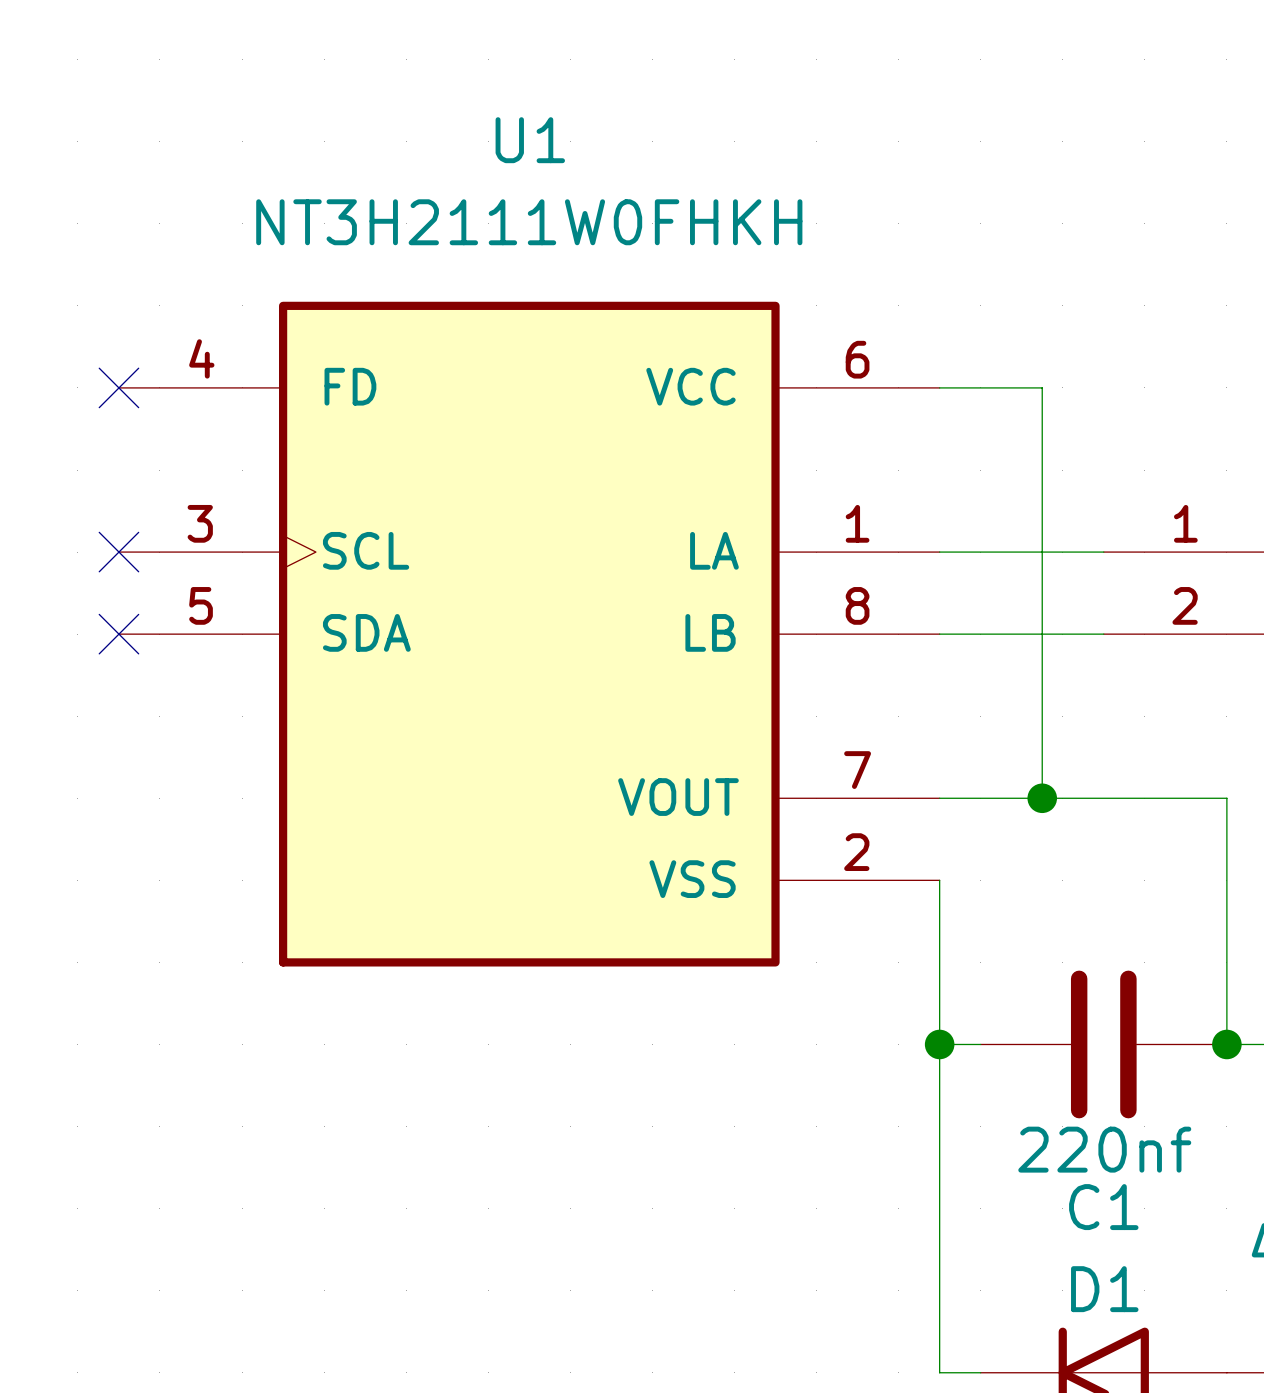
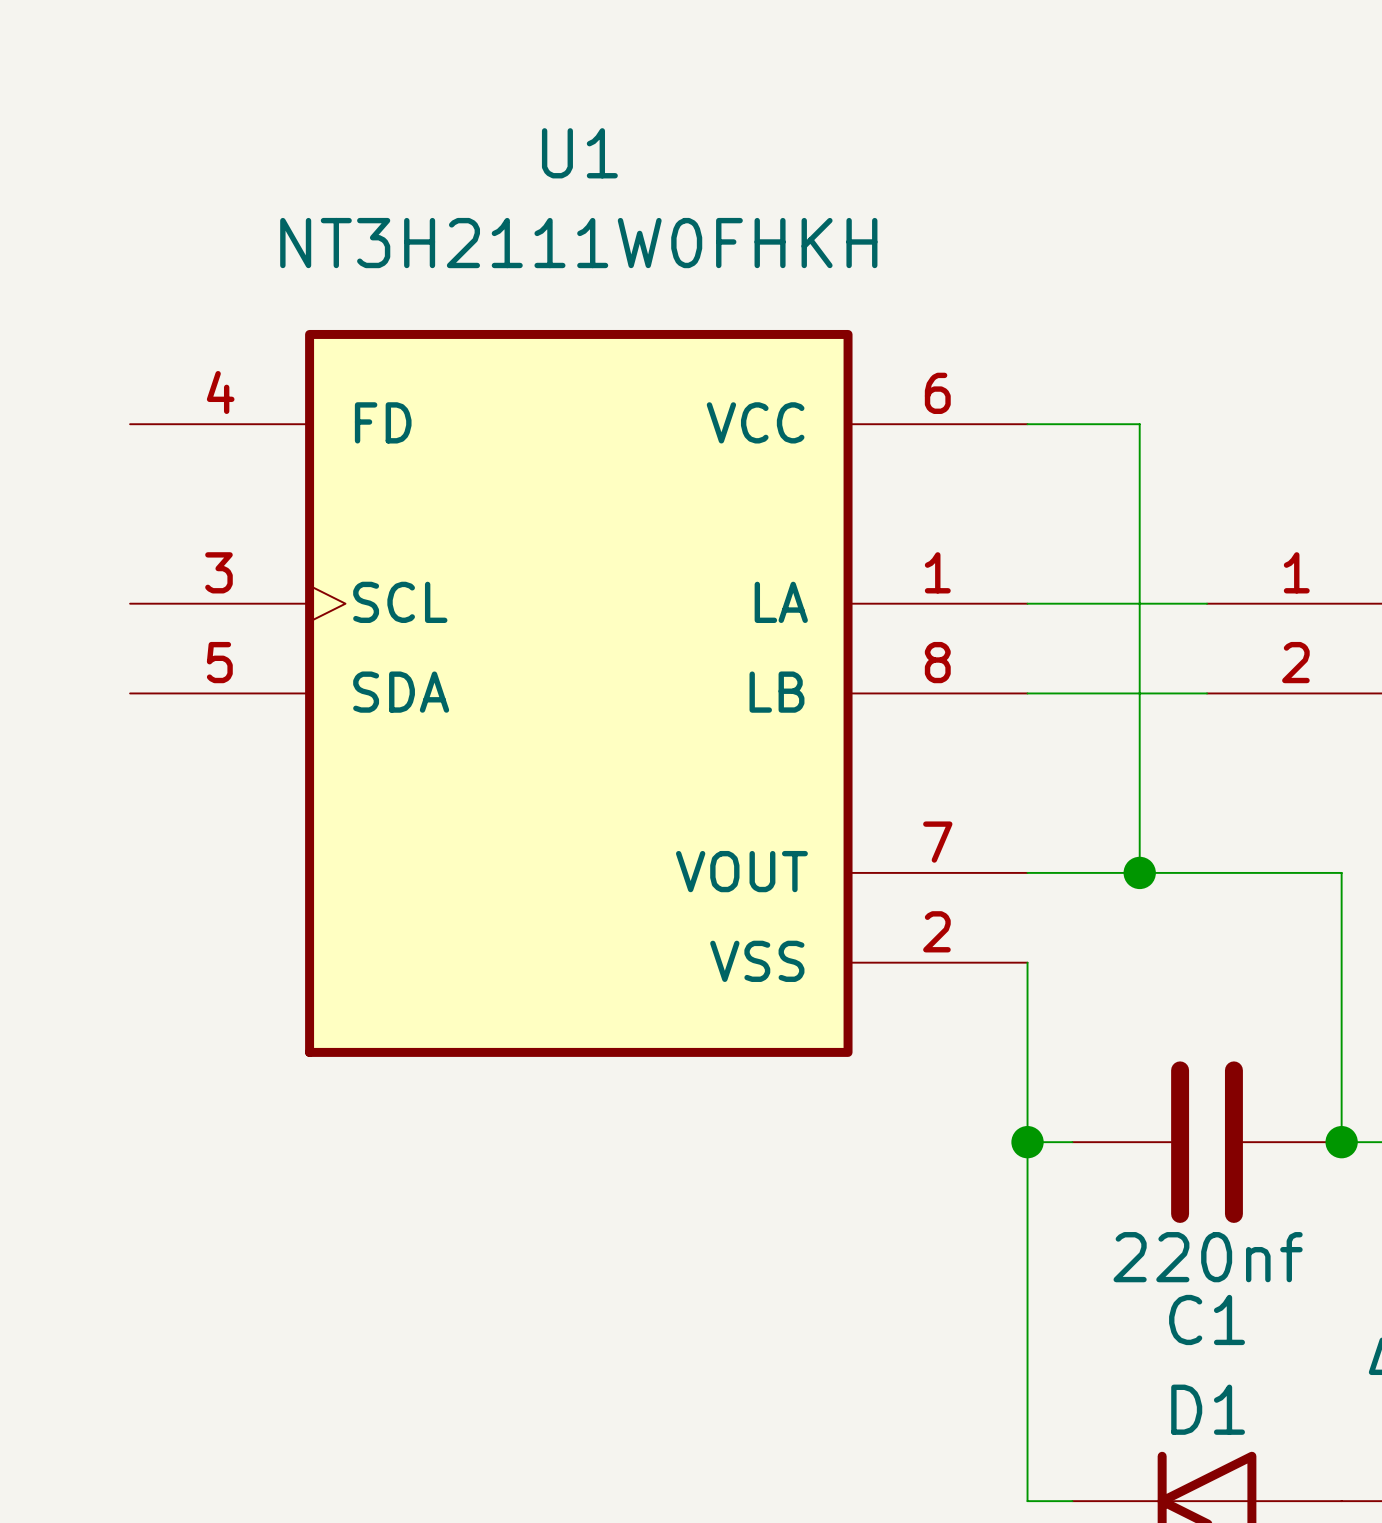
no-connect mark: (118, 387) -> none
no-connect mark: (118, 552) -> none
no-connect mark: (118, 634) -> none

